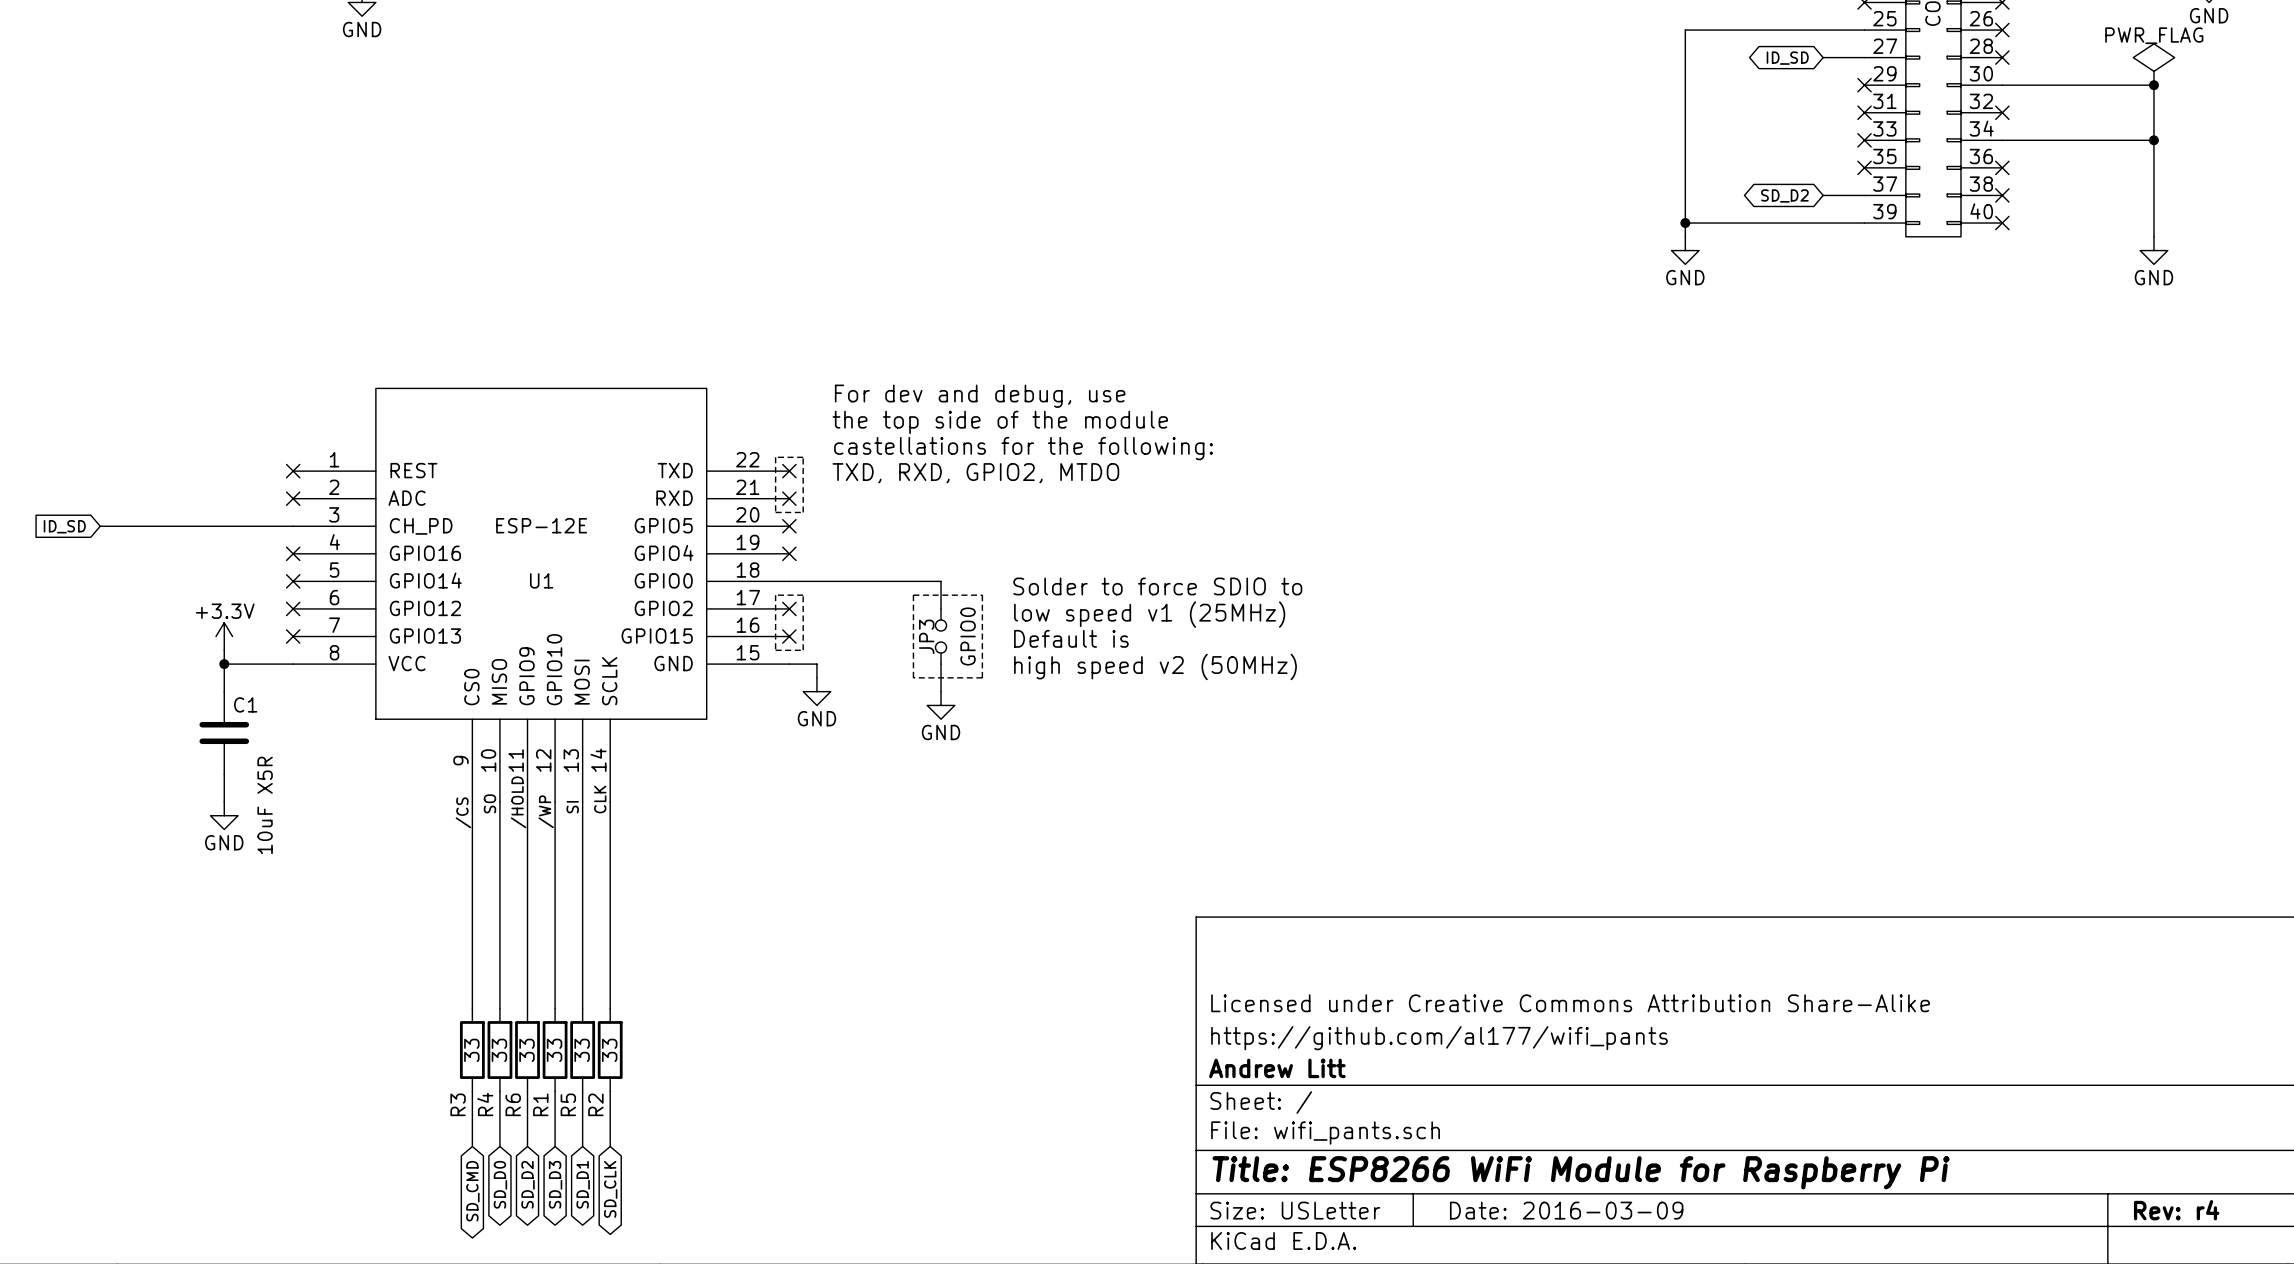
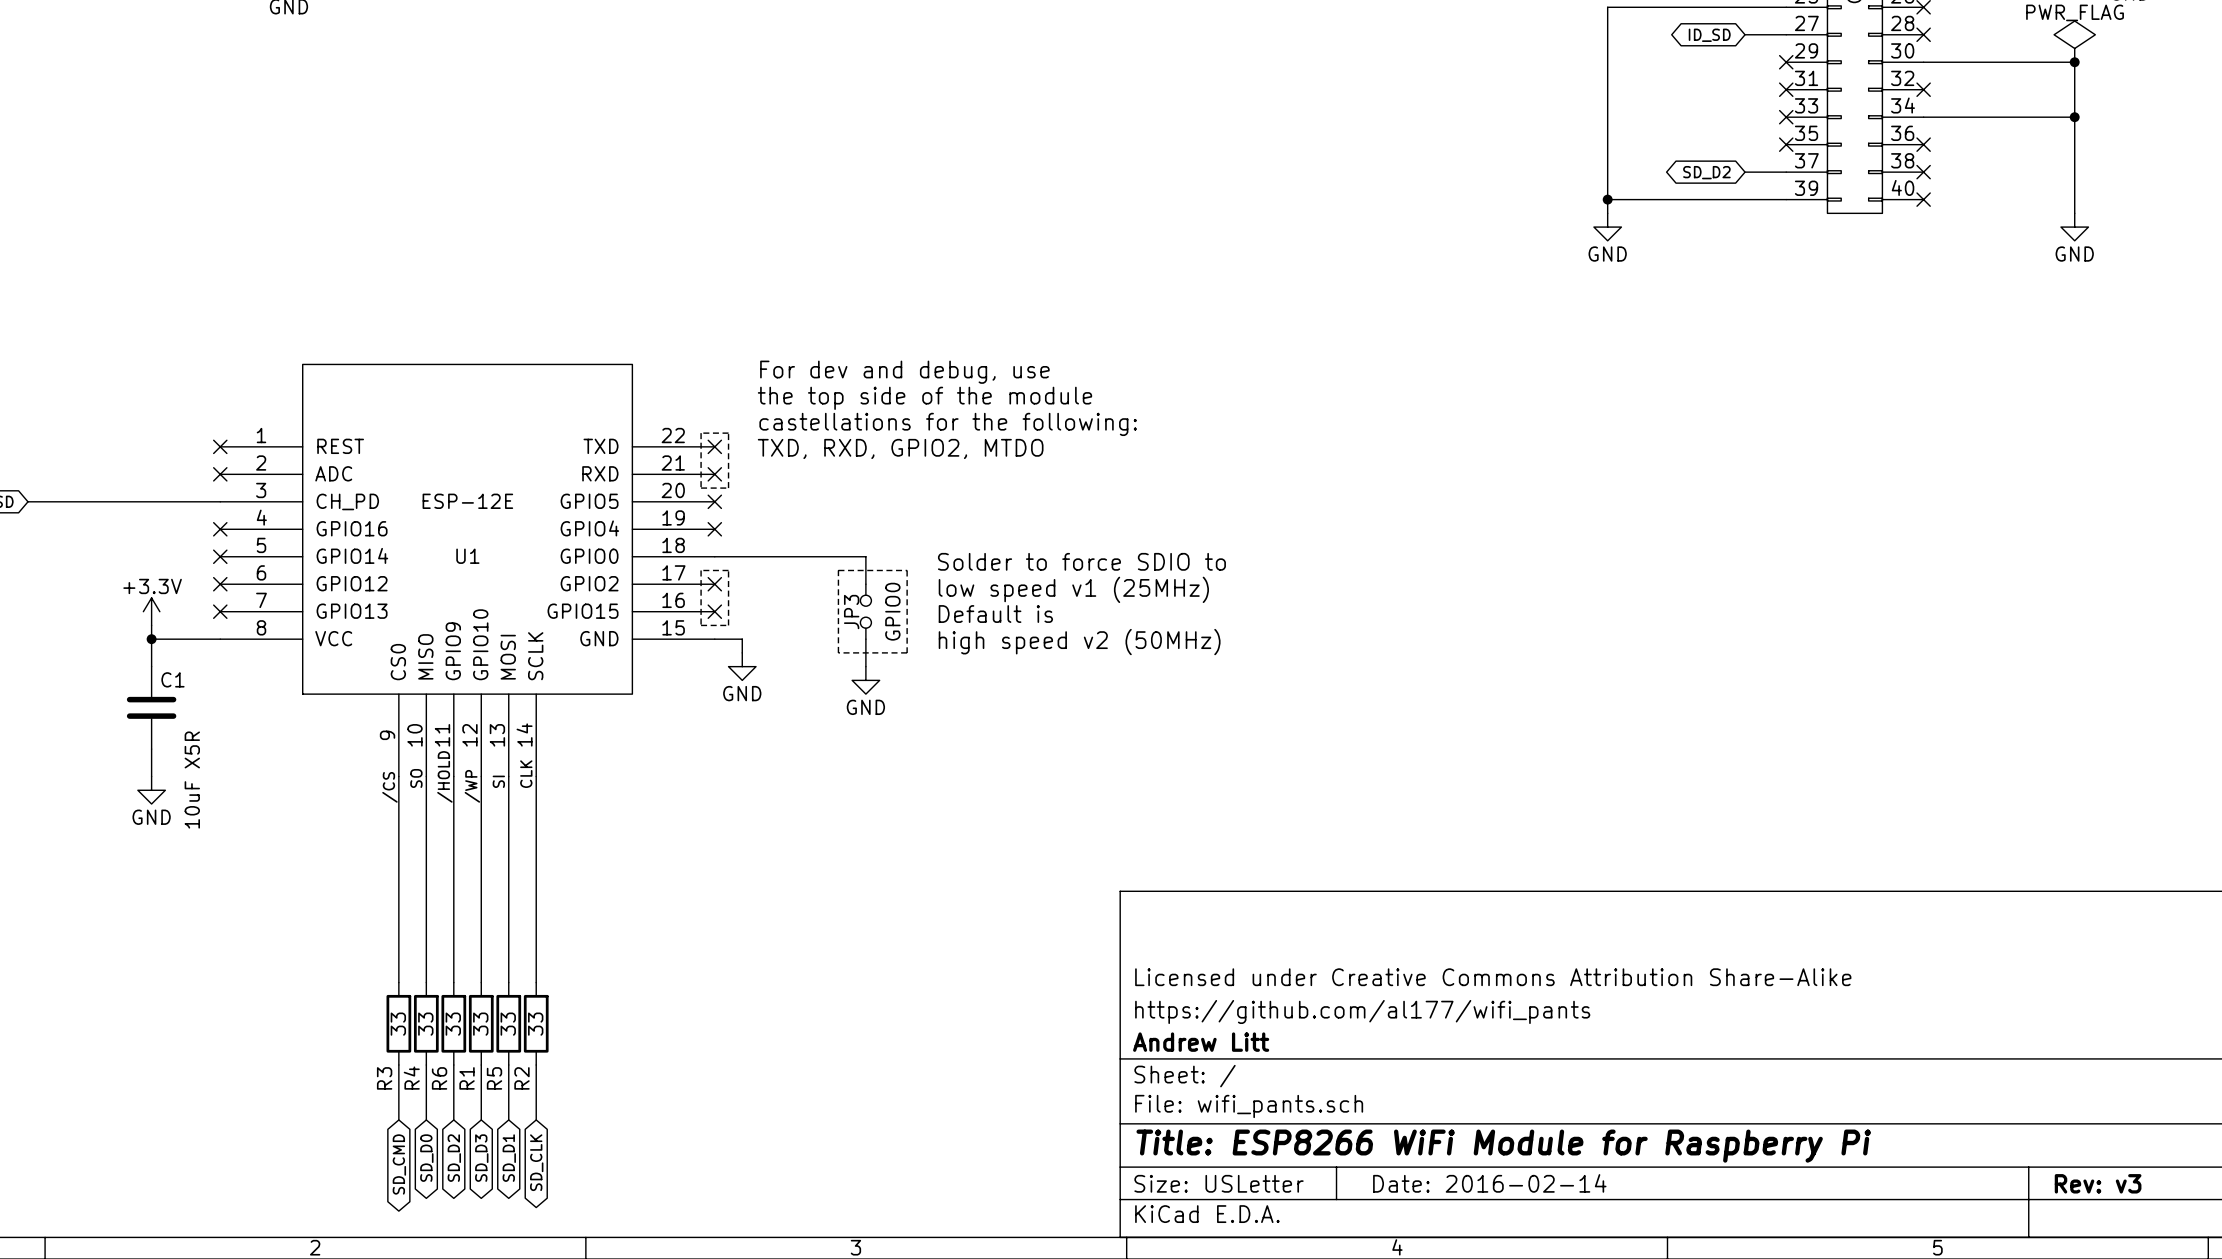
title block: Date: 2016-03-09 (1566, 1210) -> Date: 2016-02-14 (1489, 1183)
title block: Rev: r4 (2176, 1210) -> Rev: v3 (2098, 1183)

